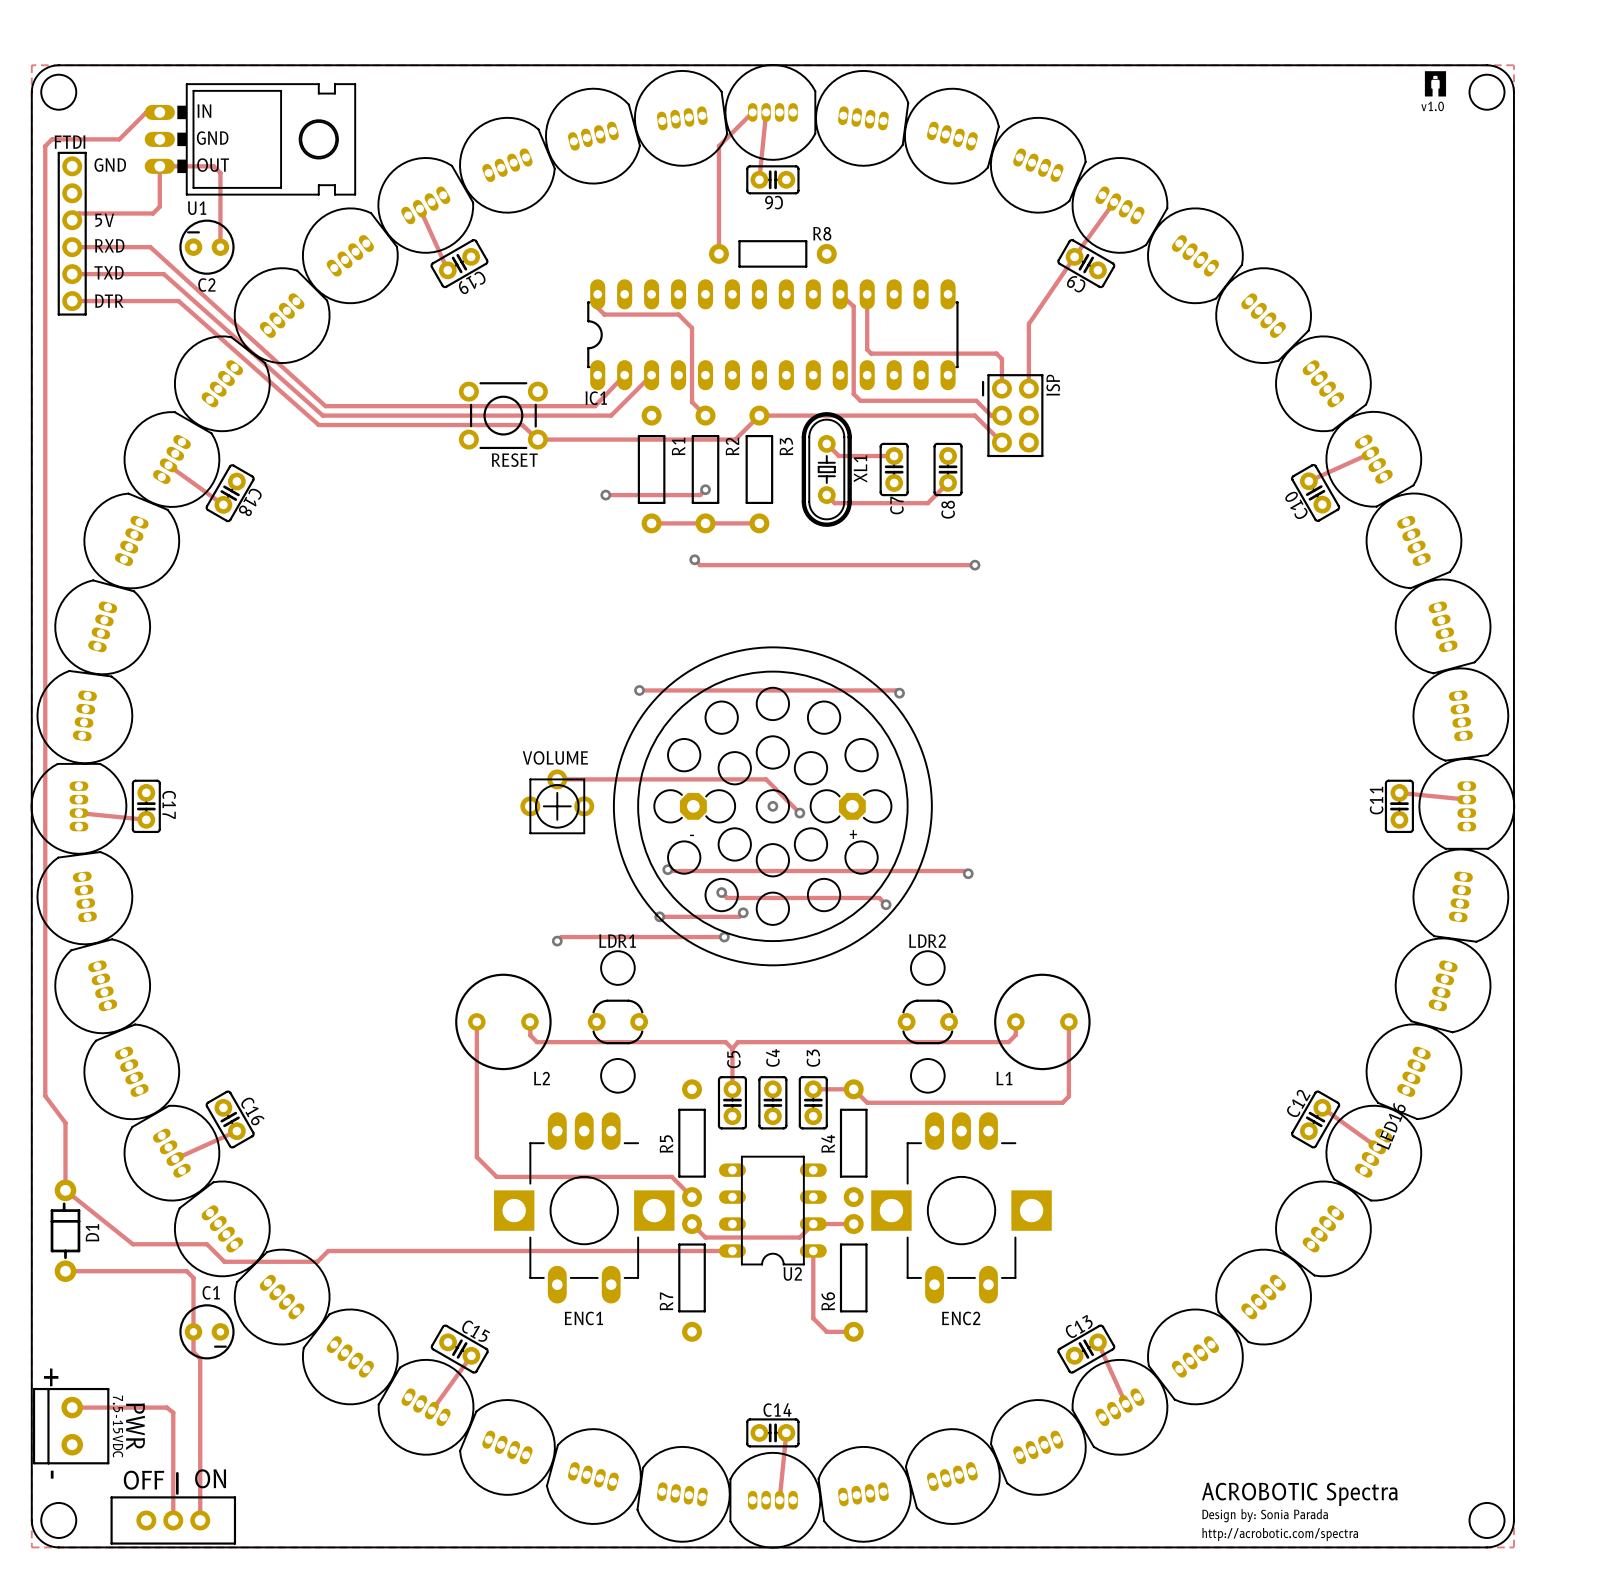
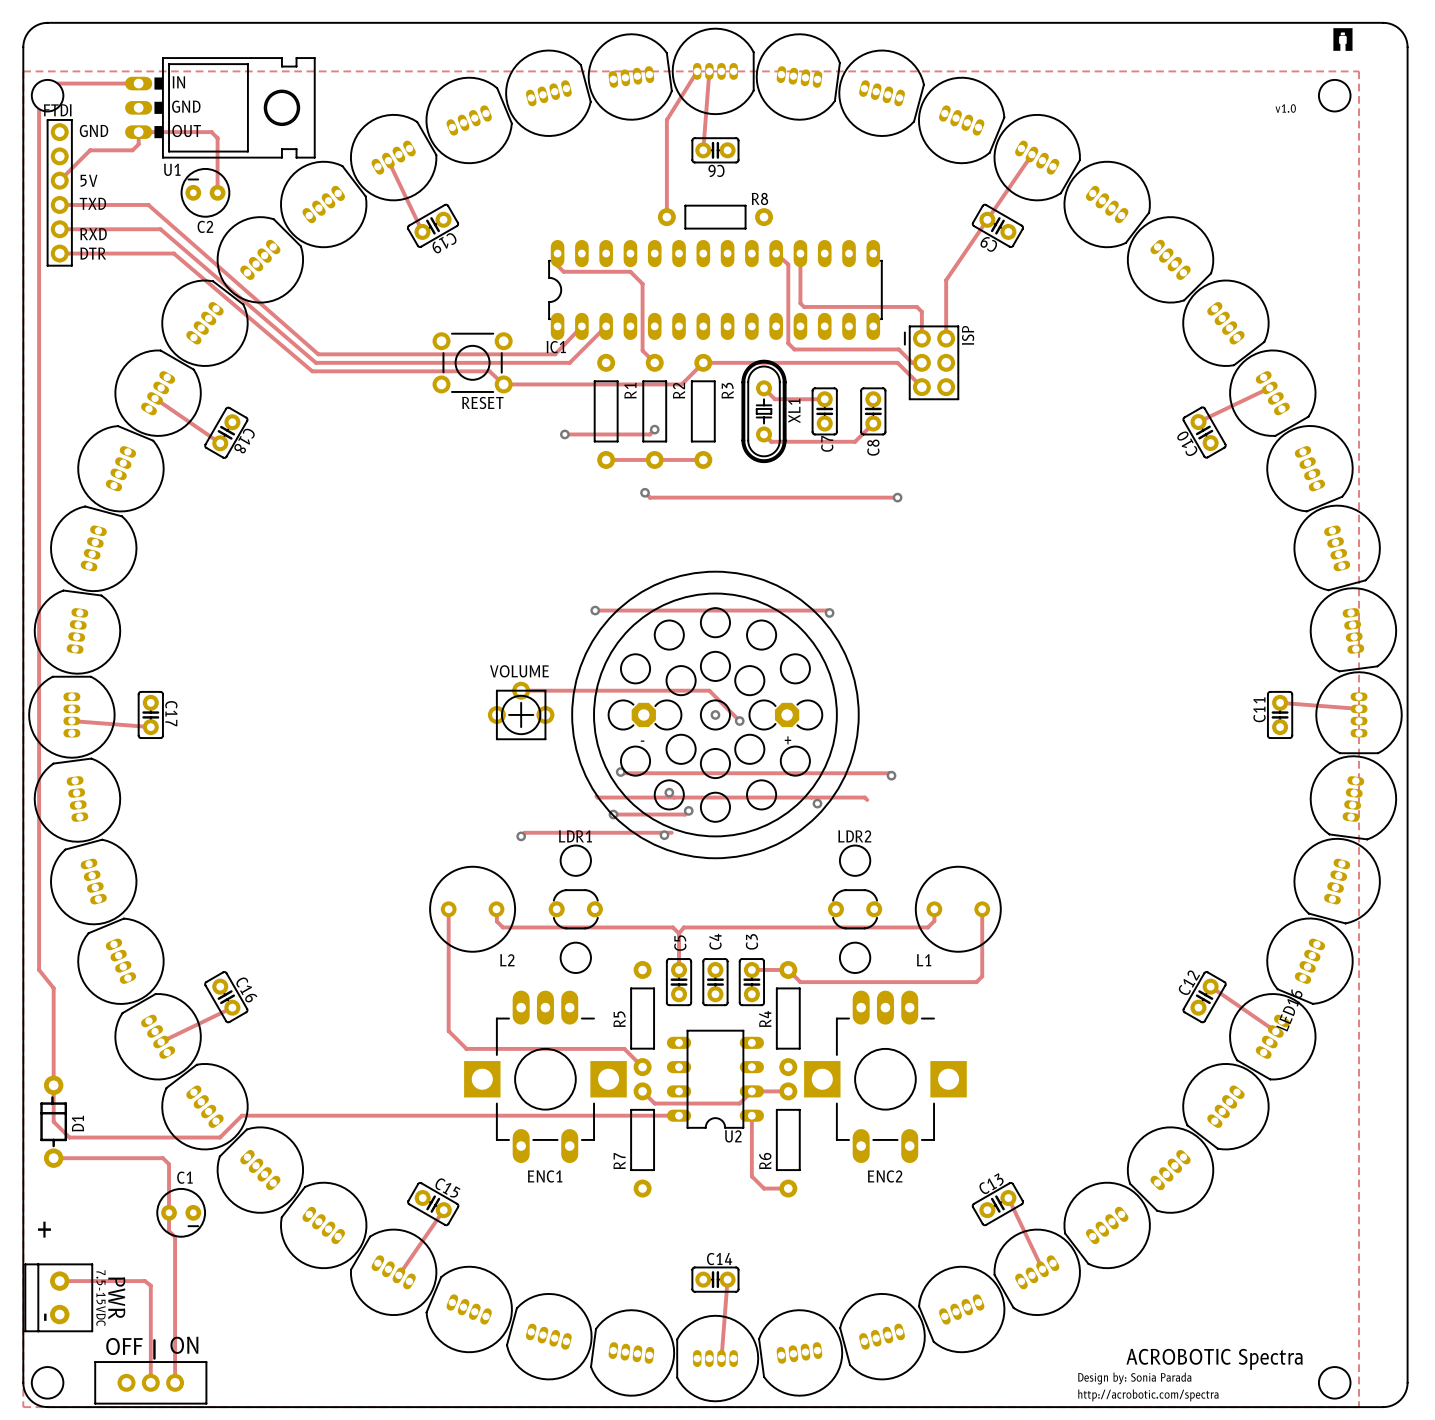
track: none -> (697, 71) (666, 119) (666, 217)
track: none -> (709, 71) (703, 150)
drawing position: (1435, 83) -> (1342, 39)
board edge: (31, 92) (33, 81) (39, 73) (48, 67) (58, 65) (1487, 65) (1497, 67) (1506, 73) (1511, 81) (1513, 92) (1513, 1520) (1511, 1530) (1506, 1539) (1497, 1545) (1487, 1547) -> (23, 95) (24, 40) (32, 27) (47, 22) (1383, 22) (1392, 24) (1400, 29) (1405, 37) (1407, 47) (1407, 1382) (1402, 1397) (1389, 1406) (1334, 1407)
text position: IN (204, 111) -> IN (178, 82)
track: (159, 112) (146, 112) (119, 139) (52, 139) (45, 146) (45, 1096) (65, 1122) -> (138, 83) (45, 83) (39, 89) (39, 969) (53, 988) (53, 1024)
track: (752, 112) (718, 146) (718, 253) -> none
track: (766, 112) (759, 179) -> none
part position: (770, 112) -> (713, 71)
part position: (681, 118) -> (630, 76)
part position: (862, 118) -> (798, 77)
part position: (592, 136) -> (548, 93)
part position: (951, 136) -> (881, 93)
text position: GND (212, 138) -> GND (186, 106)
U1 position: (250, 139) -> (220, 107)
track: none -> (1031, 154) (946, 280) (946, 338)
part: none -> (393, 157)
track: none -> (388, 160) (422, 231)
text position: GND (110, 165) -> GND (94, 130)
text position: OUT (213, 165) -> OUT (186, 130)
part position: (507, 165) -> (469, 120)
part position: (1038, 165) -> (961, 120)
C6 position: (772, 179) -> (715, 150)
track: none -> (59, 180) (90, 150) (132, 150) (138, 144) (138, 132) (211, 132) (217, 138) (217, 192)
track: (1114, 202) (1028, 323) (1028, 332) -> (800, 253) (800, 303) (804, 306) (917, 306) (921, 311)
part: (425, 205) -> none
part position: (1119, 205) -> (1037, 157)
track: (419, 208) (447, 270) -> none
part: none -> (1107, 204)
track: (153, 213) (159, 206) (159, 166) (213, 166) (220, 173) (220, 247) -> (132, 204) (148, 204) (318, 354) (555, 354) (581, 326)
text position: 5V (104, 220) -> 5V (89, 180)
FTDI position: (72, 233) -> (59, 192)
track: (72, 247) (150, 247) (325, 406) (595, 406) (624, 375) -> none
C2 position: (206, 247) -> (205, 192)
R8 position: (772, 253) -> (715, 217)
part position: (350, 255) -> (323, 204)
part: (1195, 255) -> none
C19 position: (459, 263) -> (433, 225)
C9 position: (1086, 263) -> (997, 225)
track: none -> (59, 253) (173, 253) (312, 371) (489, 371) (503, 384) (681, 384) (703, 362) (897, 362) (921, 387)
text position: TXD (109, 272) -> TXD (92, 203)
track: (72, 274) (163, 274) (322, 415) (611, 415) (638, 388) -> (59, 229) (160, 229) (315, 362) (569, 362)
track: (597, 294) (597, 307) (604, 314) (678, 314) (692, 328) (692, 402) (705, 415) -> (557, 253) (557, 265) (563, 271) (630, 271) (642, 283) (642, 350) (654, 362)
track: (840, 294) (853, 306) (853, 394) (860, 400) (976, 400) (991, 415) (1001, 415) -> none
track: (867, 294) (867, 349) (871, 353) (996, 353) (1001, 359) (1001, 388) -> none
track: (72, 301) (178, 301) (318, 425) (522, 425) (537, 439) (735, 439) (759, 415) (974, 415) (1001, 442) -> none
text position: DTR (109, 301) -> DTR (93, 253)
part position: (282, 315) -> (260, 259)
part position: (1263, 315) -> (1170, 259)
IC1 position: (772, 334) -> (715, 289)
part: none -> (204, 323)
track: none -> (606, 326) (581, 350)
track: (1028, 361) (1028, 388) -> (776, 253) (788, 264) (788, 343) (794, 349) (898, 349) (912, 362) (921, 362)
part: (222, 383) -> none
part position: (1323, 383) -> (1225, 323)
RESET position: (503, 415) -> (472, 362)
ISP position: (1012, 415) -> (931, 362)
track: none -> (1269, 387) (1198, 422)
part: none -> (1272, 393)
track: none -> (155, 398) (220, 443)
track: (826, 443) (838, 456) (894, 456) -> (764, 388) (774, 399) (824, 399)
track: (1370, 453) (1308, 481) -> none
part position: (171, 459) -> (158, 393)
part: (1373, 459) -> none
via: none -> (654, 429)
track: (168, 465) (223, 504) -> none
via: none -> (564, 434)
R1 position: (651, 469) -> (606, 411)
R2 position: (705, 469) -> (654, 411)
R3 position: (759, 469) -> (703, 411)
XL1 position: (826, 469) -> (764, 411)
C7 position: (894, 469) -> (824, 411)
C8 position: (948, 469) -> (873, 411)
track: (948, 482) (927, 503) (834, 503) (826, 495) -> (873, 423) (855, 441) (771, 441) (764, 434)
track: (705, 489) (700, 495) (605, 495) -> (654, 429) (649, 434) (564, 434)
via: (705, 489) -> none
C10 position: (1315, 492) -> (1204, 432)
C18 position: (230, 493) -> (226, 432)
via: (605, 495) -> none
track: (651, 523) (759, 523) -> (606, 459) (703, 459)
via: none -> (645, 492)
part position: (131, 540) -> (120, 468)
part position: (1413, 540) -> (1309, 468)
track: (694, 559) (700, 565) (974, 565) -> (645, 492) (649, 497) (897, 497)
via: (694, 559) -> none
via position: (974, 565) -> (897, 497)
part position: (1443, 626) -> (1337, 547)
part position: (102, 627) -> (93, 548)
track: (639, 690) (896, 690) (899, 693) -> (595, 610) (827, 610) (829, 612)
via position: (639, 690) -> (595, 610)
via position: (899, 693) -> (829, 612)
part position: (1460, 714) -> (1353, 629)
part position: (84, 717) -> (77, 632)
track: none -> (1280, 702) (1359, 708)
track: (557, 779) (766, 779) (799, 813) -> (521, 690) (709, 690) (739, 721)
via: none -> (715, 714)
track: none -> (71, 721) (150, 727)
via: none -> (739, 721)
track: (1399, 792) (1466, 799) -> none
VOLUME position: (557, 801) -> (521, 710)
part position: (1466, 803) -> (1359, 712)
C17 position: (146, 806) -> (150, 714)
part position: (772, 806) -> (715, 714)
via: (772, 806) -> none
C11 position: (1399, 806) -> (1280, 714)
part position: (78, 808) -> (71, 717)
track: (78, 813) (146, 819) -> none
via: (799, 813) -> none
track: none -> (620, 772) (889, 773) (891, 775)
via: none -> (620, 772)
via: none -> (891, 775)
via: none -> (669, 792)
via: (667, 869) -> none
via: (968, 873) -> none
via: none -> (817, 803)
via: none -> (688, 810)
via: none -> (613, 814)
track: (721, 892) (727, 897) (879, 897) (886, 904) -> none
via: (721, 892) -> none
part position: (1460, 895) -> (1353, 797)
part position: (84, 898) -> (77, 800)
via: (886, 904) -> none
track: (743, 912) (739, 916) (659, 916) -> (688, 810) (685, 814) (613, 814)
via: none -> (521, 836)
via: (659, 916) -> none
track: (724, 937) (561, 937) (557, 941) -> (671, 832) (524, 832) (521, 836)
via: (724, 937) -> none
via: (557, 941) -> none
round board edge position: (617, 968) -> (575, 860)
round board edge position: (927, 968) -> (855, 860)
part position: (1443, 985) -> (1337, 881)
part position: (102, 986) -> (93, 882)
track: (476, 1021) (476, 1157) (496, 1176) (671, 1176) (692, 1197) -> (448, 909) (448, 1031) (466, 1048) (624, 1048) (642, 1067)
L2 position: (503, 1021) -> (472, 909)
track: (529, 1021) (530, 1035) (537, 1042) (725, 1042) (732, 1048) -> (496, 909) (496, 921) (502, 927) (672, 927) (679, 933)
LDR1 position: (617, 1021) -> (575, 909)
LDR2 position: (927, 1021) -> (855, 909)
track: (1015, 1021) (1015, 1035) (1008, 1042) (737, 1042) (732, 1048) -> (934, 909) (934, 921) (927, 927) (683, 927) (679, 933)
L1 position: (1042, 1021) -> (958, 909)
track: (1068, 1021) (1068, 1096) (1062, 1102) (867, 1102) (853, 1089) (813, 1089) -> (982, 909) (982, 976) (976, 982) (800, 982) (788, 969) (751, 969)
track: (732, 1048) (732, 1089) -> (679, 933) (679, 969)
part position: (131, 1071) -> (120, 961)
LED16 position: (1413, 1071) -> (1309, 961)
round board edge position: (617, 1075) -> (575, 957)
round board edge position: (927, 1075) -> (855, 957)
track: none -> (1210, 986) (1275, 1031)
C5 position: (732, 1102) -> (679, 982)
C4 position: (772, 1102) -> (715, 982)
C3 position: (813, 1102) -> (751, 982)
track: none -> (232, 1007) (161, 1042)
track: (1322, 1107) (1377, 1147) -> none
C16 position: (230, 1119) -> (226, 997)
C12 position: (1315, 1119) -> (1204, 997)
track: (236, 1131) (175, 1159) -> none
R5 position: (692, 1143) -> (642, 1018)
R4 position: (853, 1143) -> (788, 1018)
part position: (171, 1153) -> (158, 1036)
part position: (1373, 1153) -> (1272, 1036)
track: (65, 1190) (132, 1244) (206, 1244) (224, 1261) (317, 1261) (328, 1250) (732, 1250) -> (53, 1085) (53, 1121) (69, 1137) (220, 1137) (241, 1115) (679, 1115)
ENC1 position: (584, 1207) -> (545, 1076)
ENC2 position: (961, 1207) -> (885, 1076)
U2 position: (772, 1210) -> (715, 1079)
part: none -> (1225, 1106)
track: (692, 1224) (705, 1237) (799, 1237) (813, 1224) (853, 1224) -> (642, 1091) (654, 1103) (739, 1103) (751, 1091) (788, 1091)
part position: (222, 1228) -> (204, 1106)
part: (1323, 1228) -> none
track: (813, 1250) (813, 1318) (826, 1331) (853, 1331) -> (751, 1115) (751, 1176) (764, 1188) (788, 1188)
R7 position: (692, 1277) -> (642, 1139)
R6 position: (853, 1277) -> (788, 1139)
part position: (282, 1297) -> (260, 1170)
part position: (1263, 1297) -> (1170, 1170)
track: none -> (1008, 1198) (1042, 1269)
track: none -> (443, 1210) (398, 1275)
track: (1097, 1342) (1125, 1403) -> none
part: none -> (323, 1225)
C15 position: (459, 1349) -> (433, 1204)
C13 position: (1086, 1349) -> (997, 1204)
track: (471, 1355) (431, 1410) -> none
part: (350, 1356) -> none
part position: (1195, 1356) -> (1107, 1225)
text position: + (51, 1377) -> + (44, 1229)
track: none -> (727, 1279) (721, 1358)
part position: (426, 1407) -> (393, 1272)
part position: (1120, 1407) -> (1037, 1272)
C14 position: (772, 1432) -> (715, 1279)
track: (786, 1432) (779, 1500) -> none
part position: (507, 1447) -> (469, 1309)
part position: (1038, 1447) -> (961, 1309)
text position: - (52, 1474) -> - (45, 1317)
part position: (593, 1476) -> (549, 1336)
part position: (952, 1476) -> (882, 1336)
part position: (683, 1494) -> (632, 1352)
part position: (864, 1494) -> (800, 1352)
text position: ACROBOTIC Spectra (1299, 1494) -> ACROBOTIC Spectra (1214, 1359)
part position: (775, 1500) -> (717, 1358)

